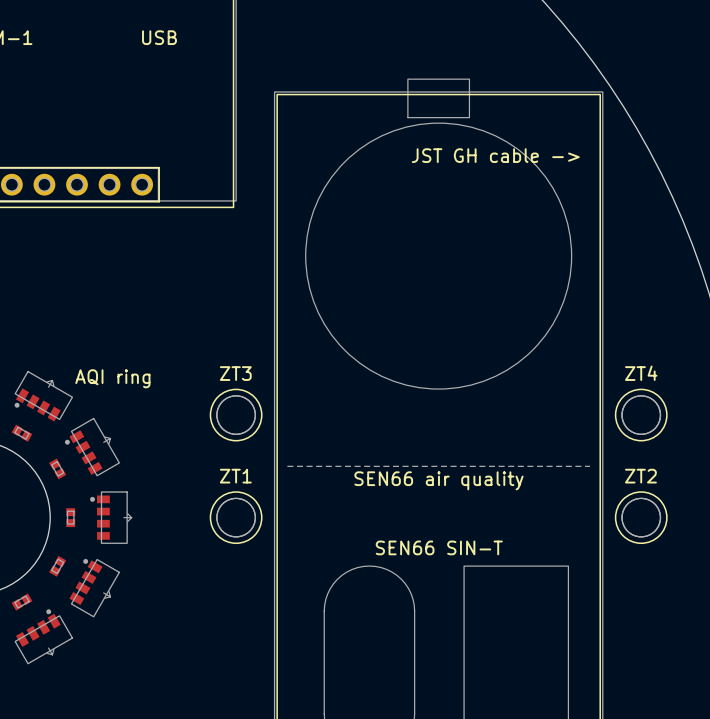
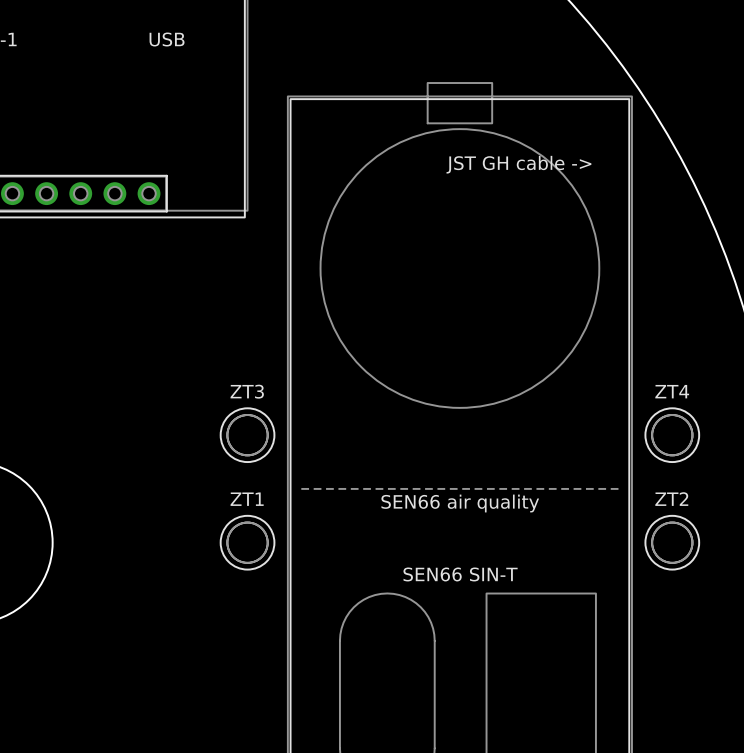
text: AQI ring (112, 378) -> none
part: (43, 396) -> none
part: (22, 433) -> none
part: (92, 447) -> none
part: (57, 468) -> none
part: (70, 517) -> none
part: (111, 517) -> none
part: (57, 566) -> none
part: (94, 588) -> none
part: (22, 602) -> none
part: (43, 636) -> none

